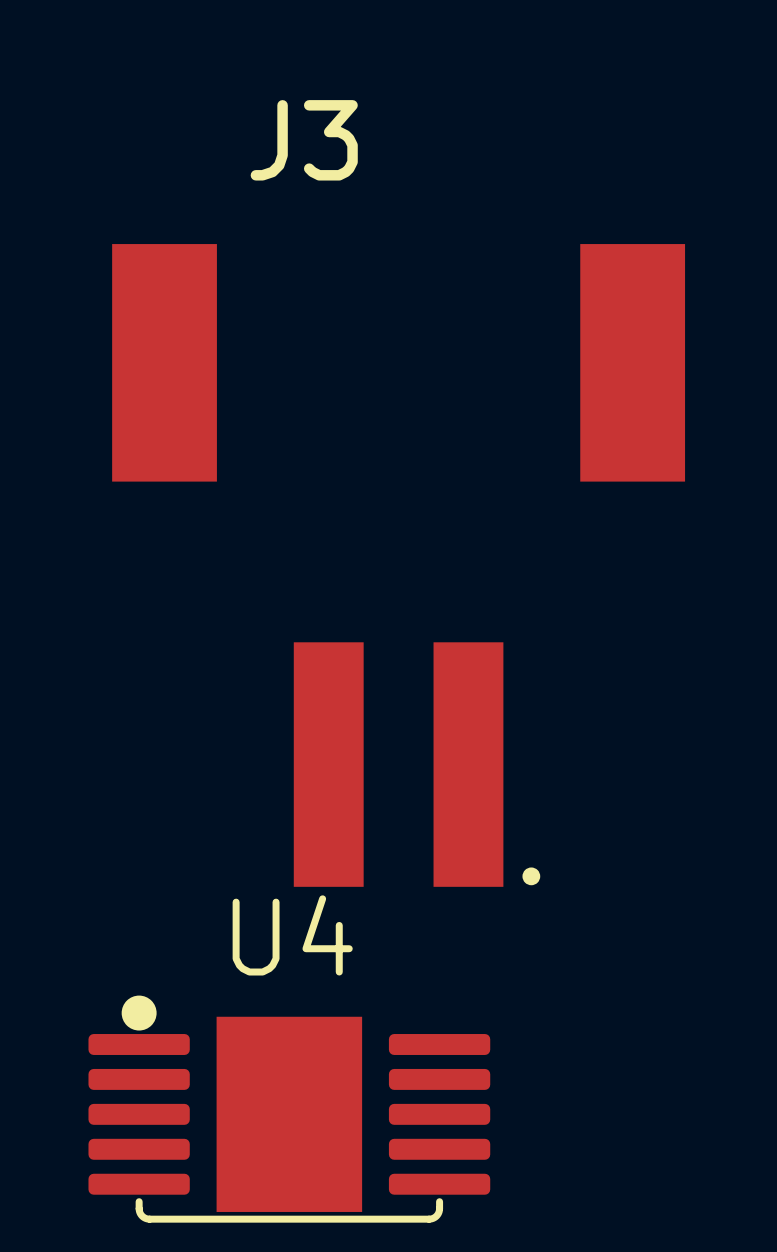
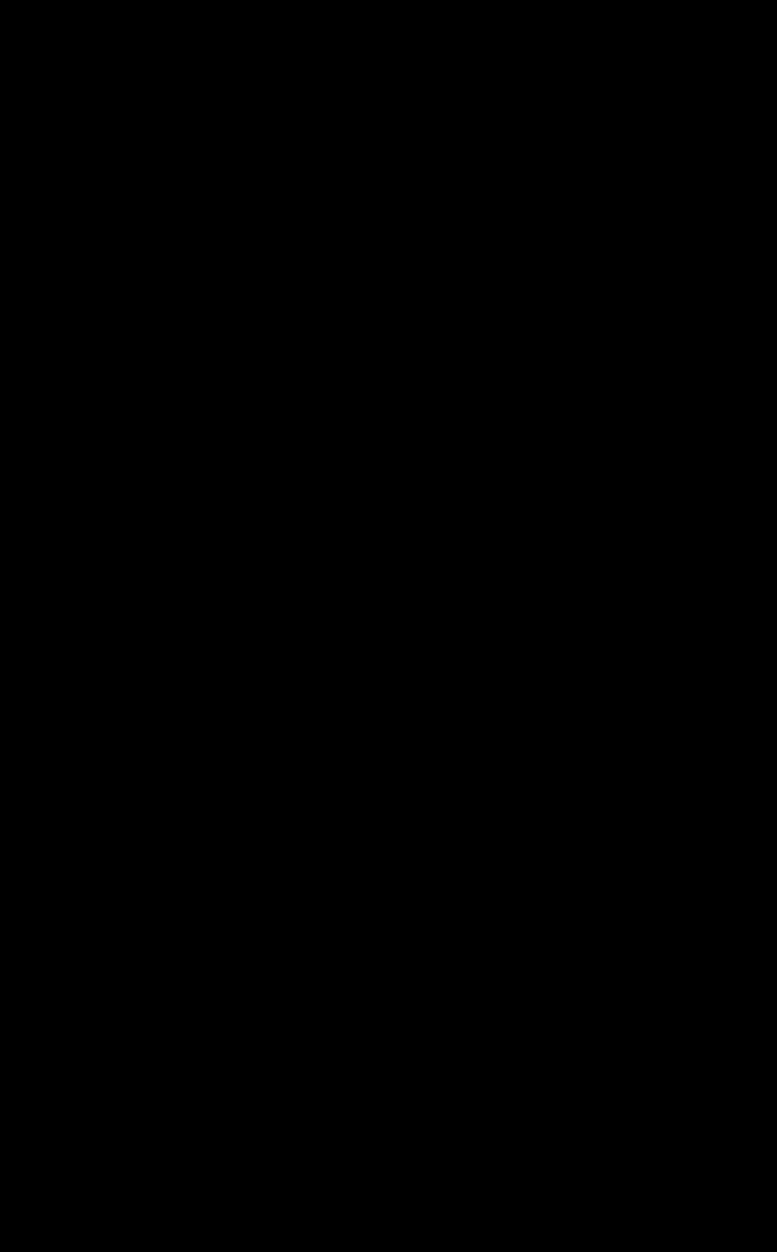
J3: (398, 565) -> none
U4: (289, 1109) -> none

